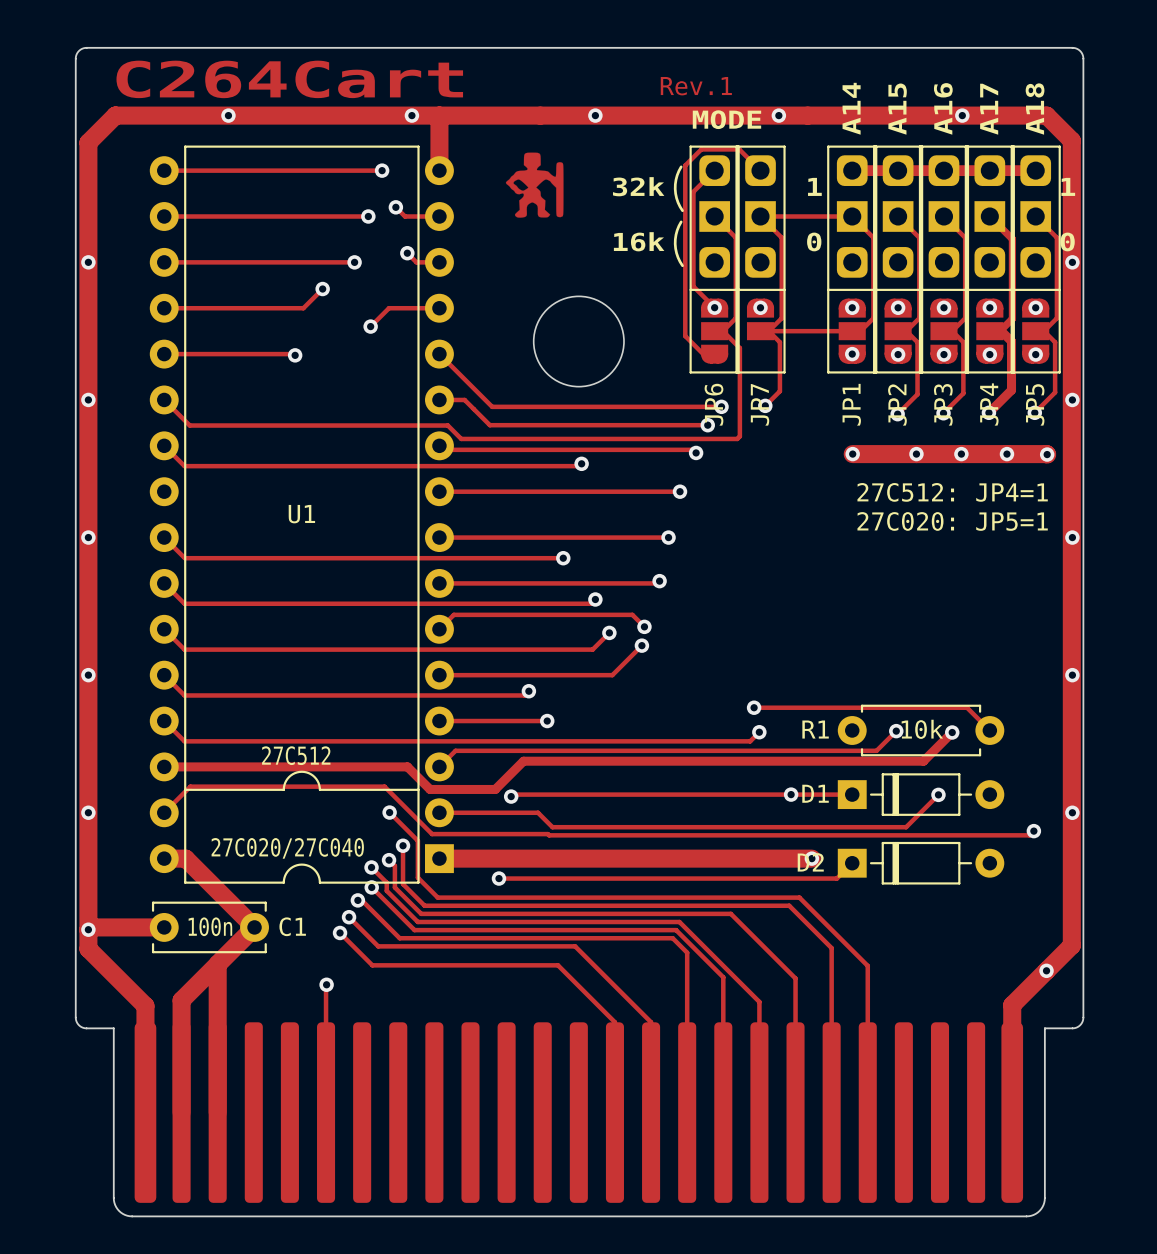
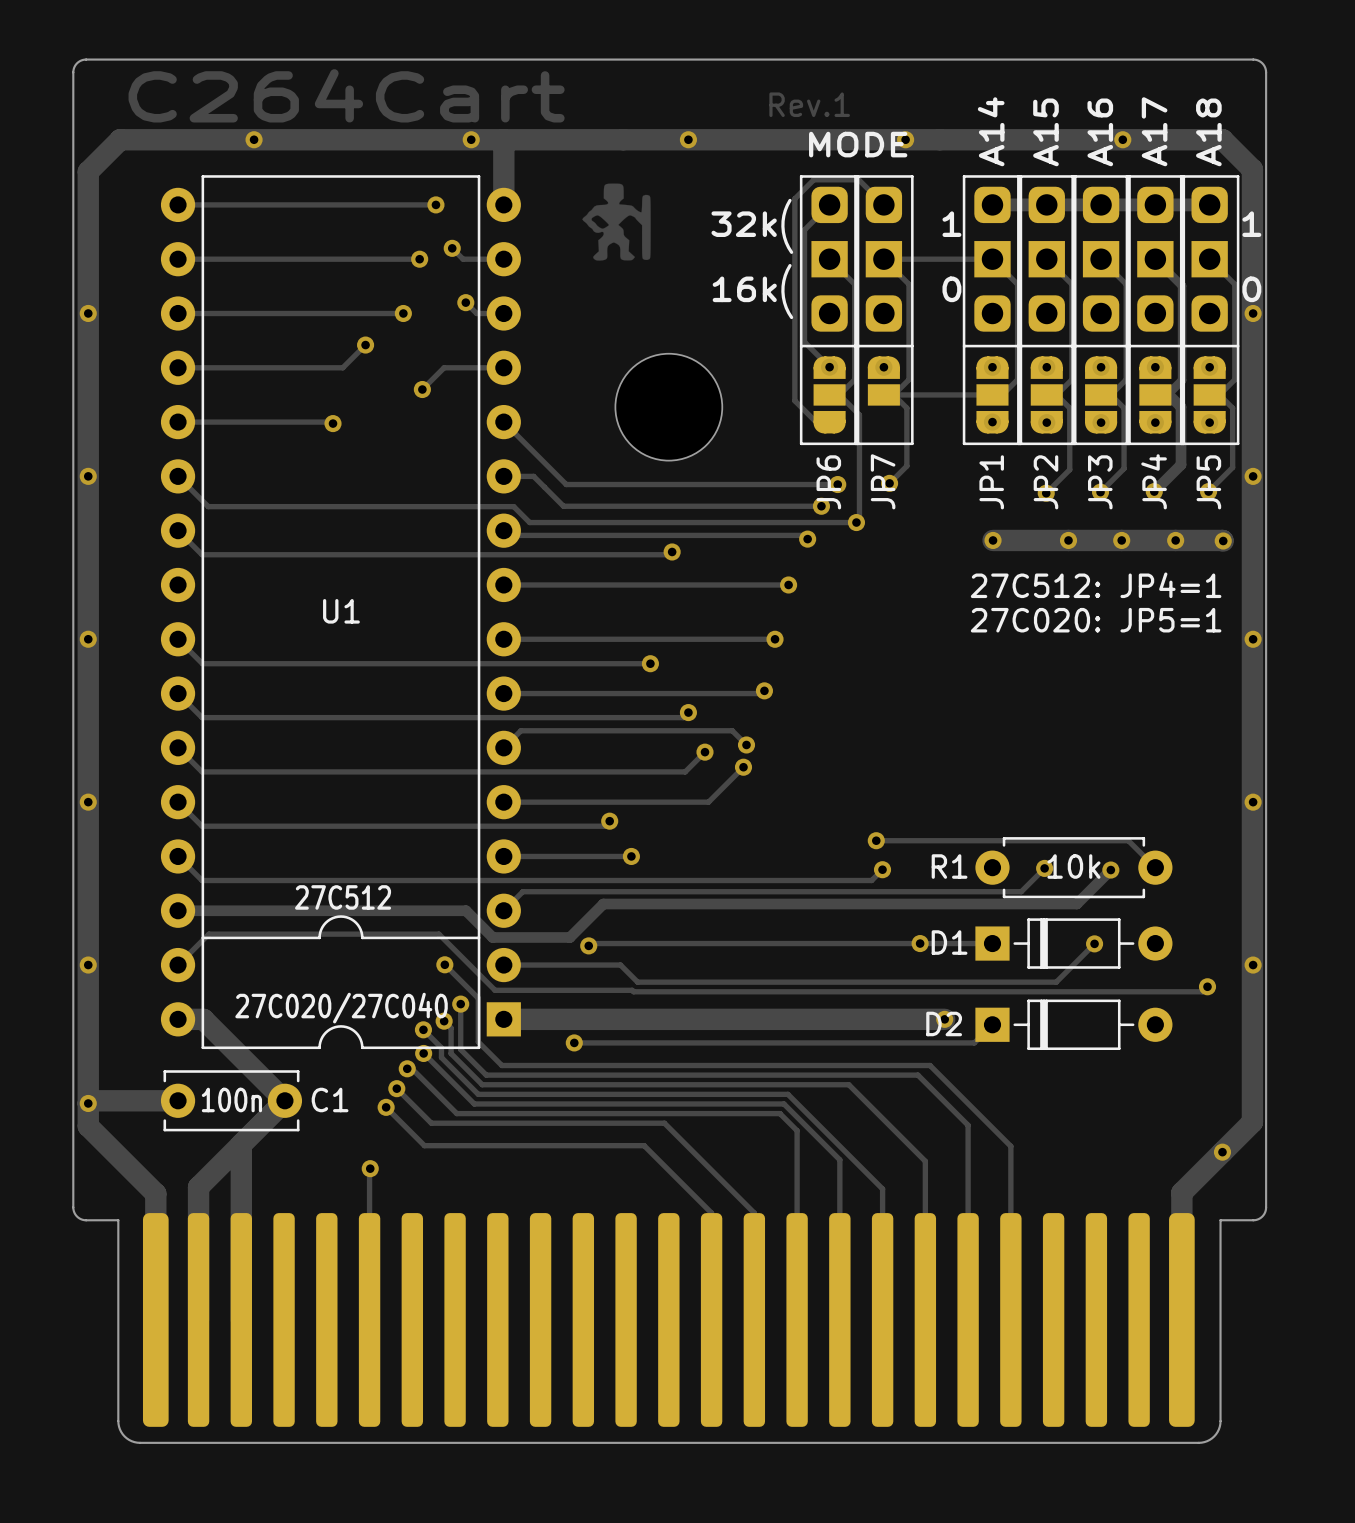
via: none -> (856, 522)

